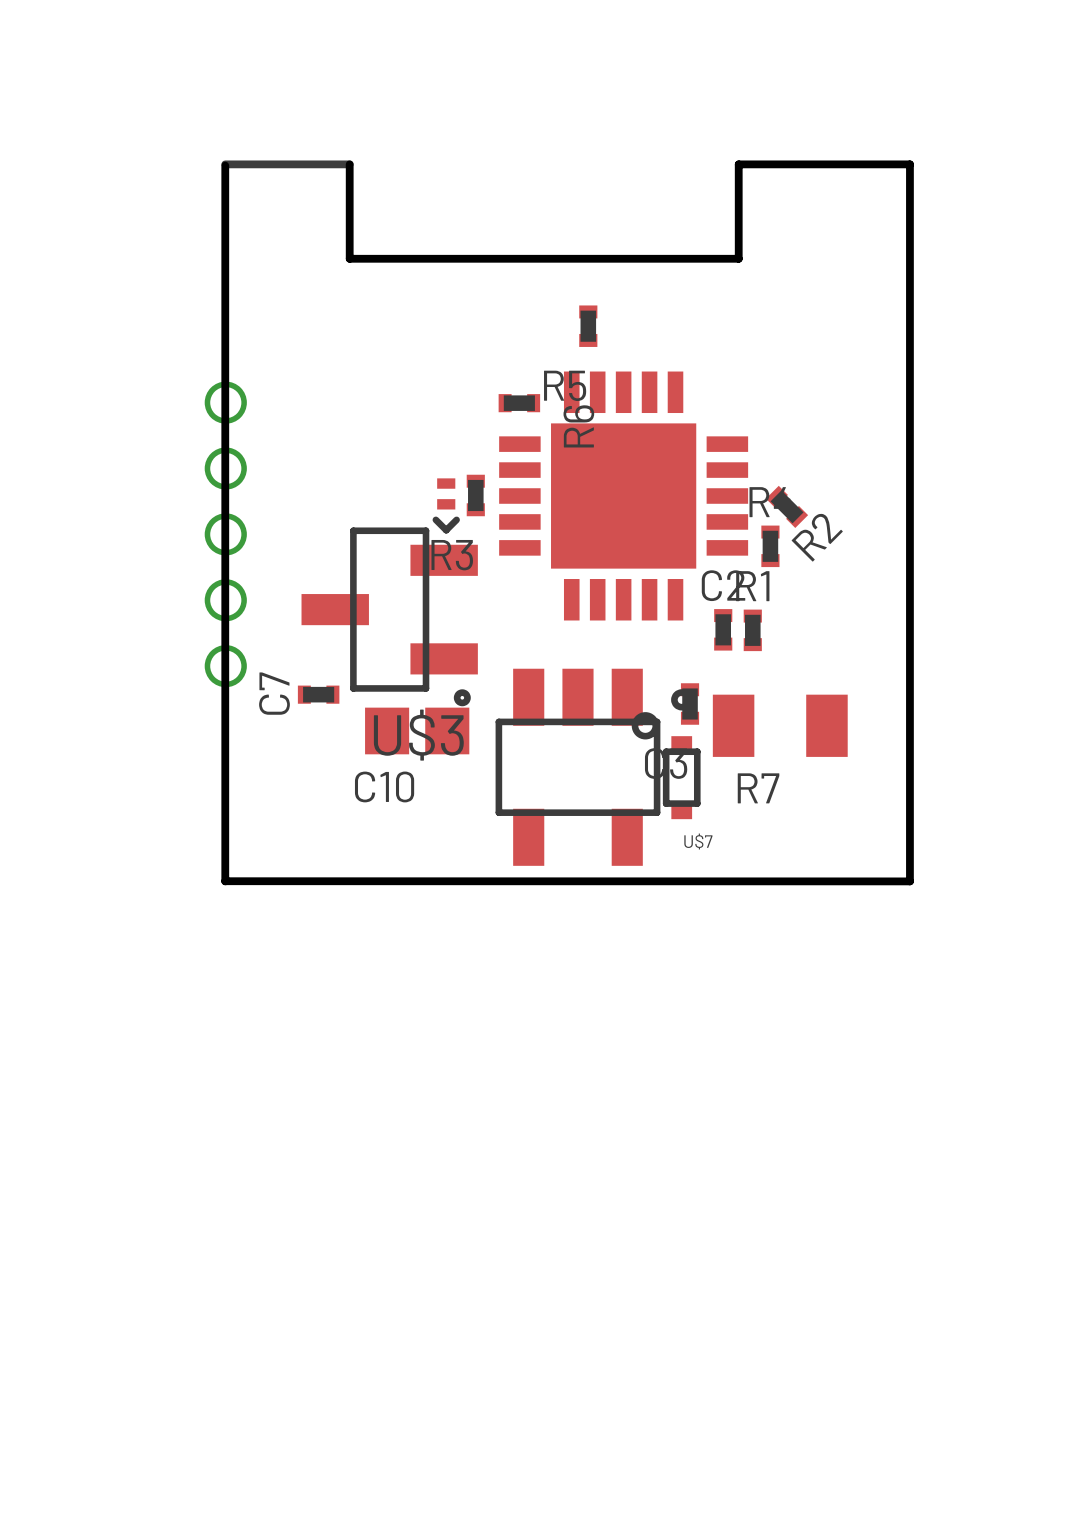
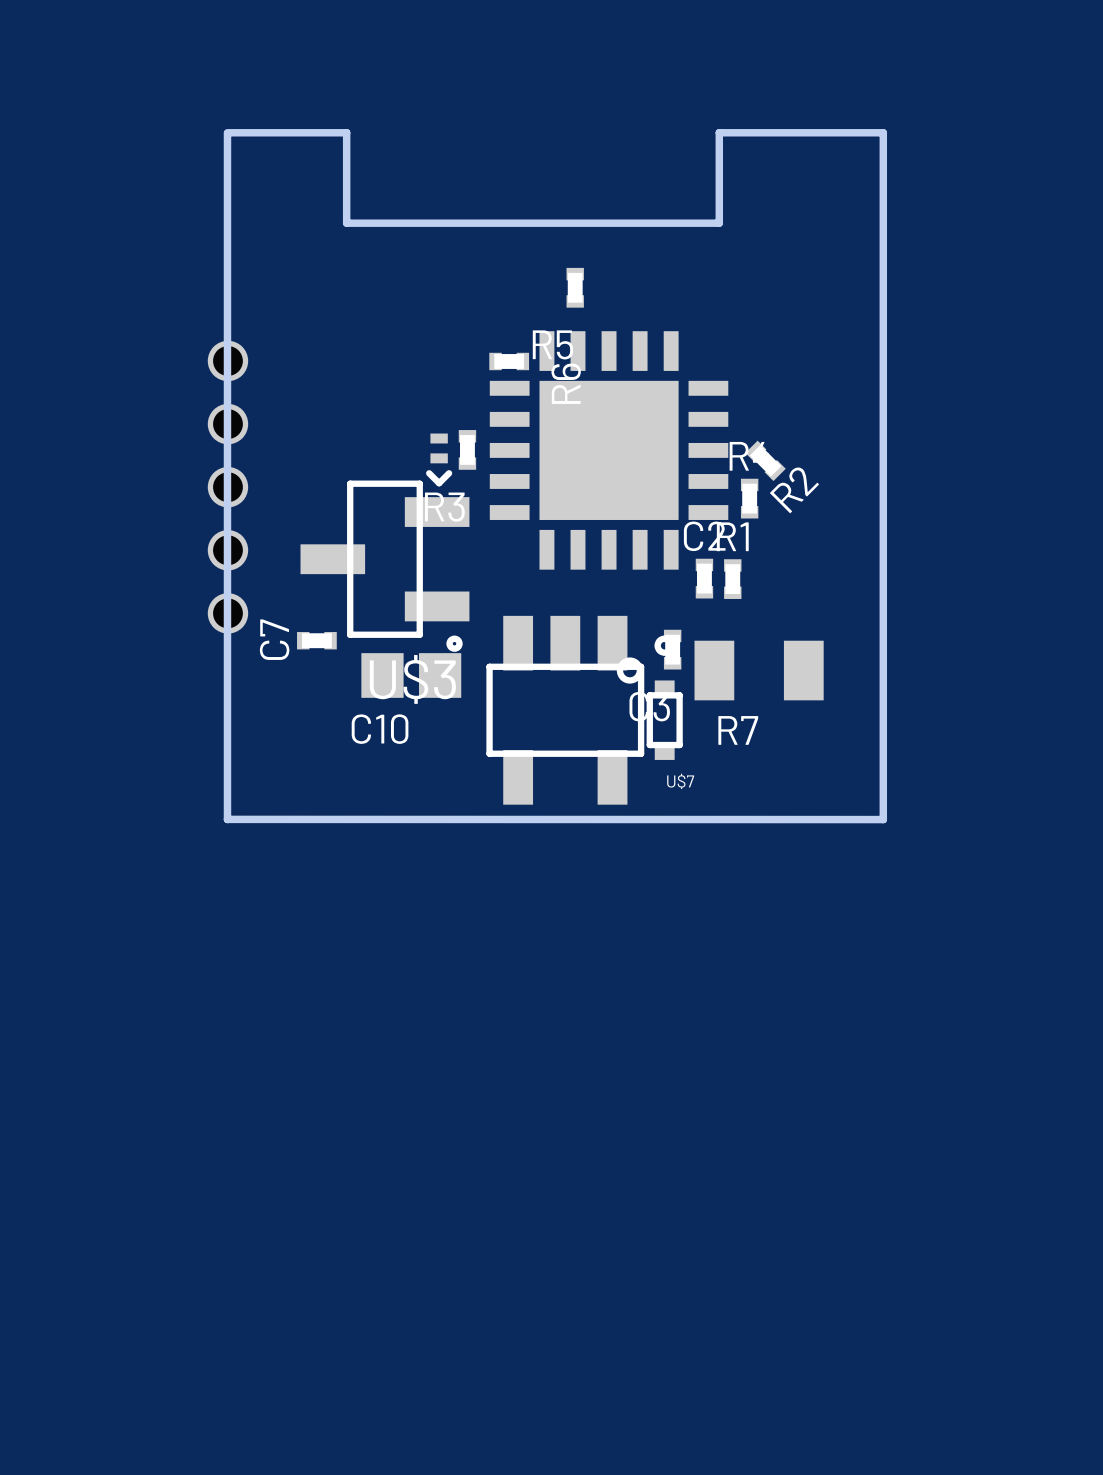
board edge: none -> (227, 132) (346, 132)
line: (225, 164) (349, 164) -> none
part footprint: [499, 371, 749, 621] -> [489, 331, 729, 570]

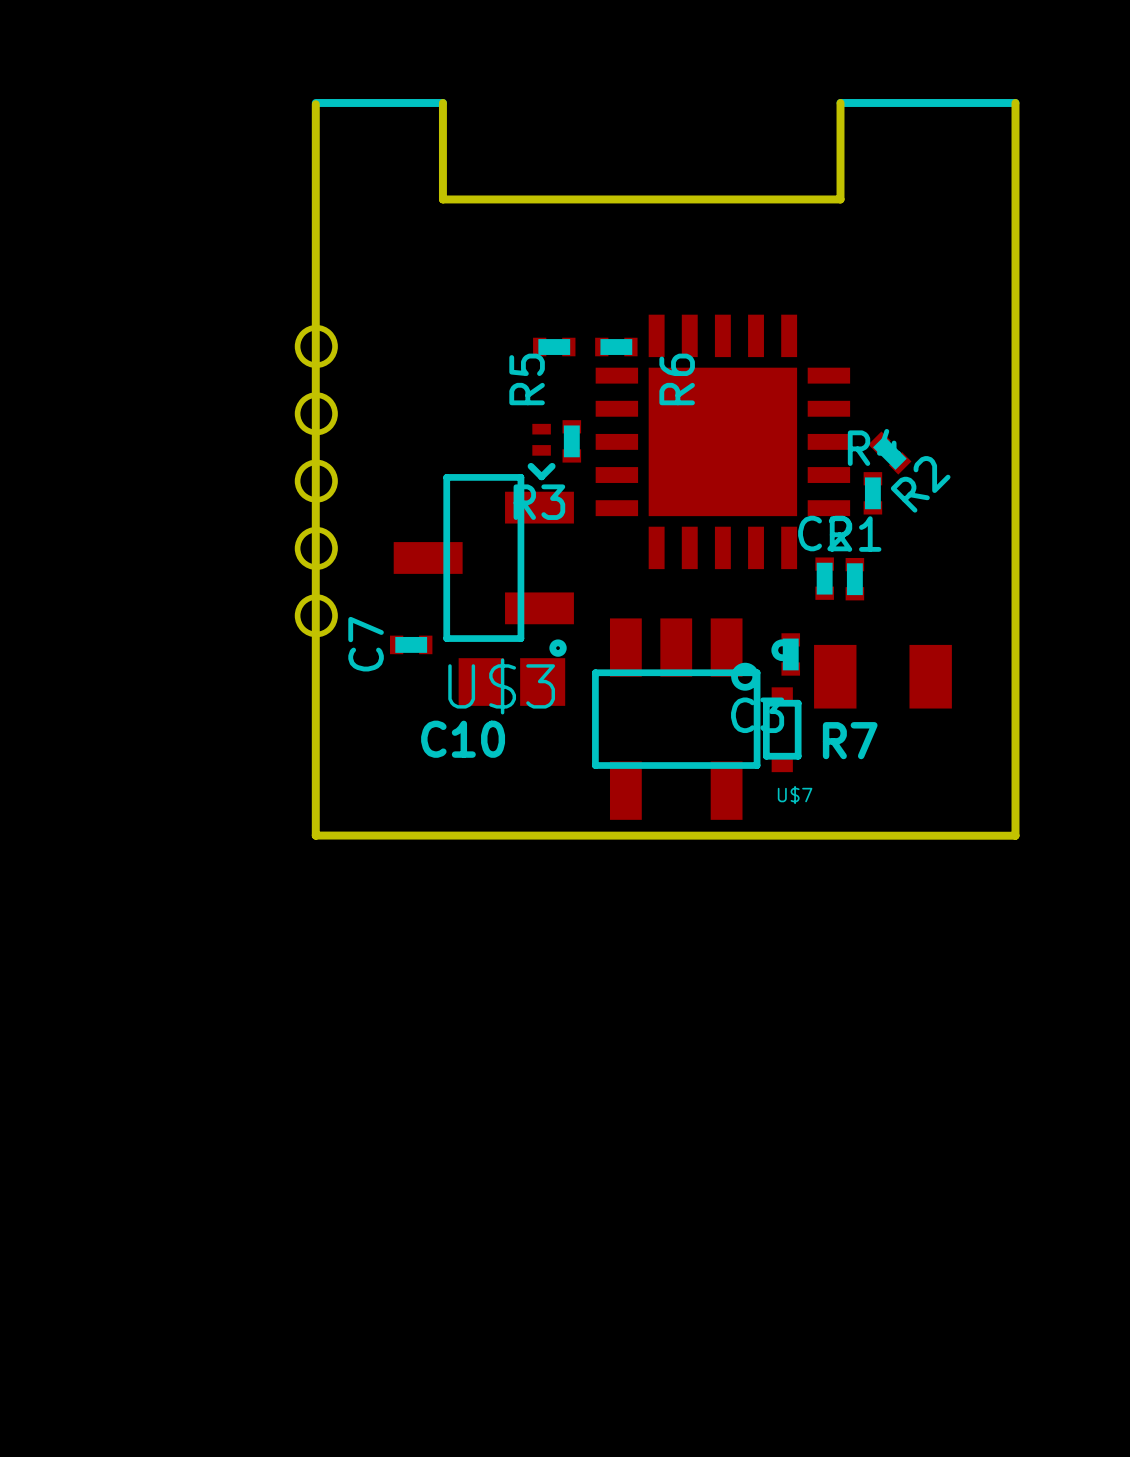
board edge: (227, 132) (346, 132) -> none
line: none -> (315, 102) (442, 102)
board edge: (719, 132) (883, 132) -> none
line: none -> (840, 102) (1015, 102)
R5 rotation: 0° (575, 287) -> 90° clockwise (554, 347)
R5 position: (575, 287) -> (554, 347)

